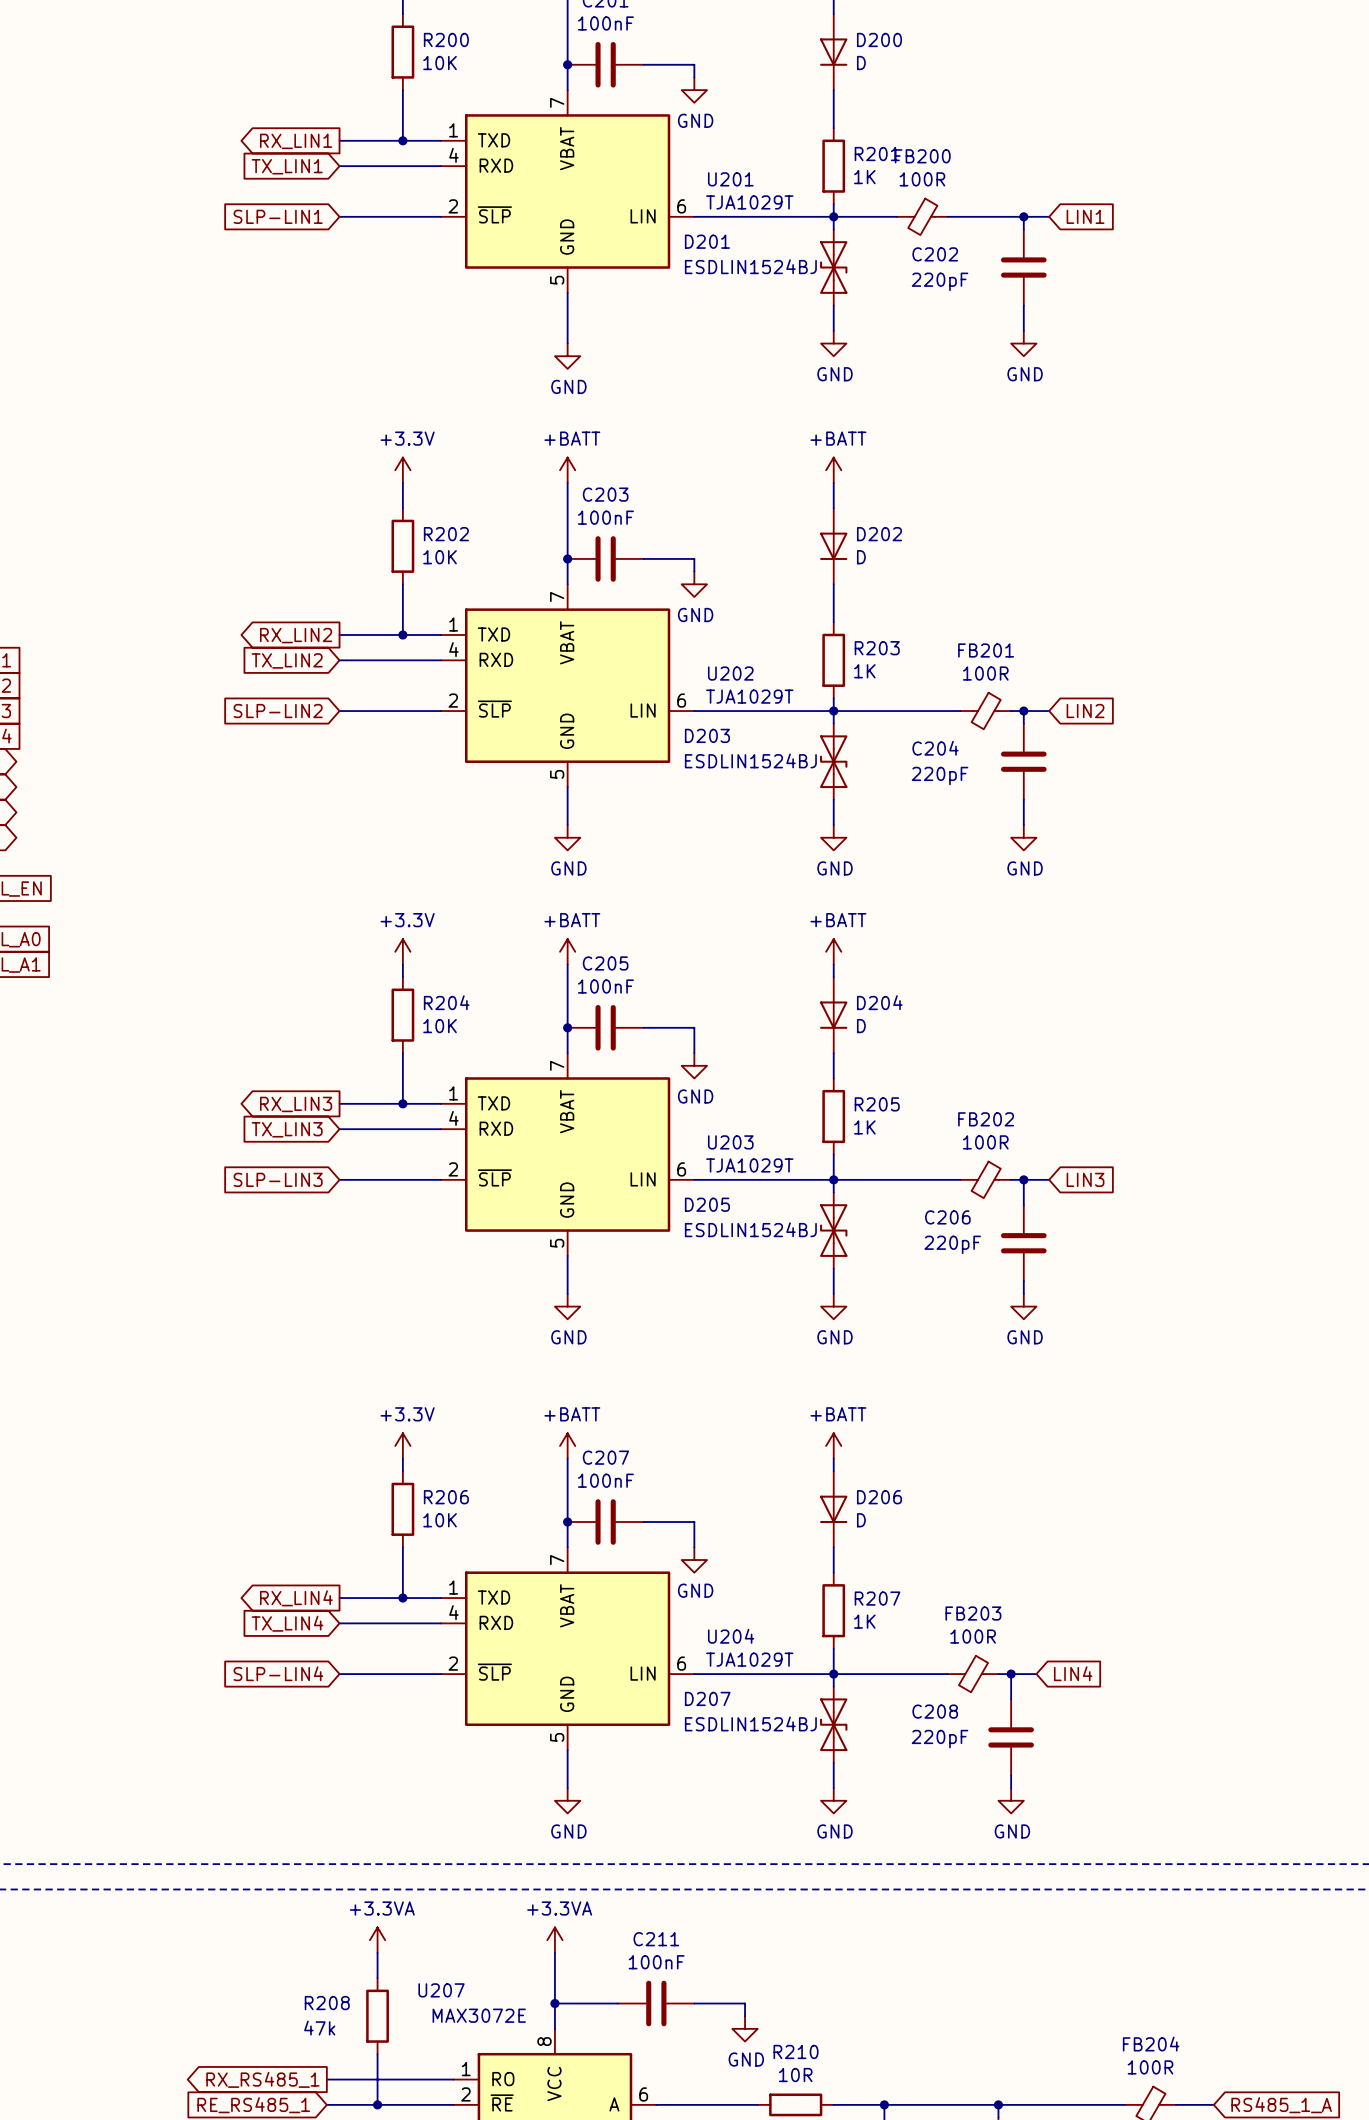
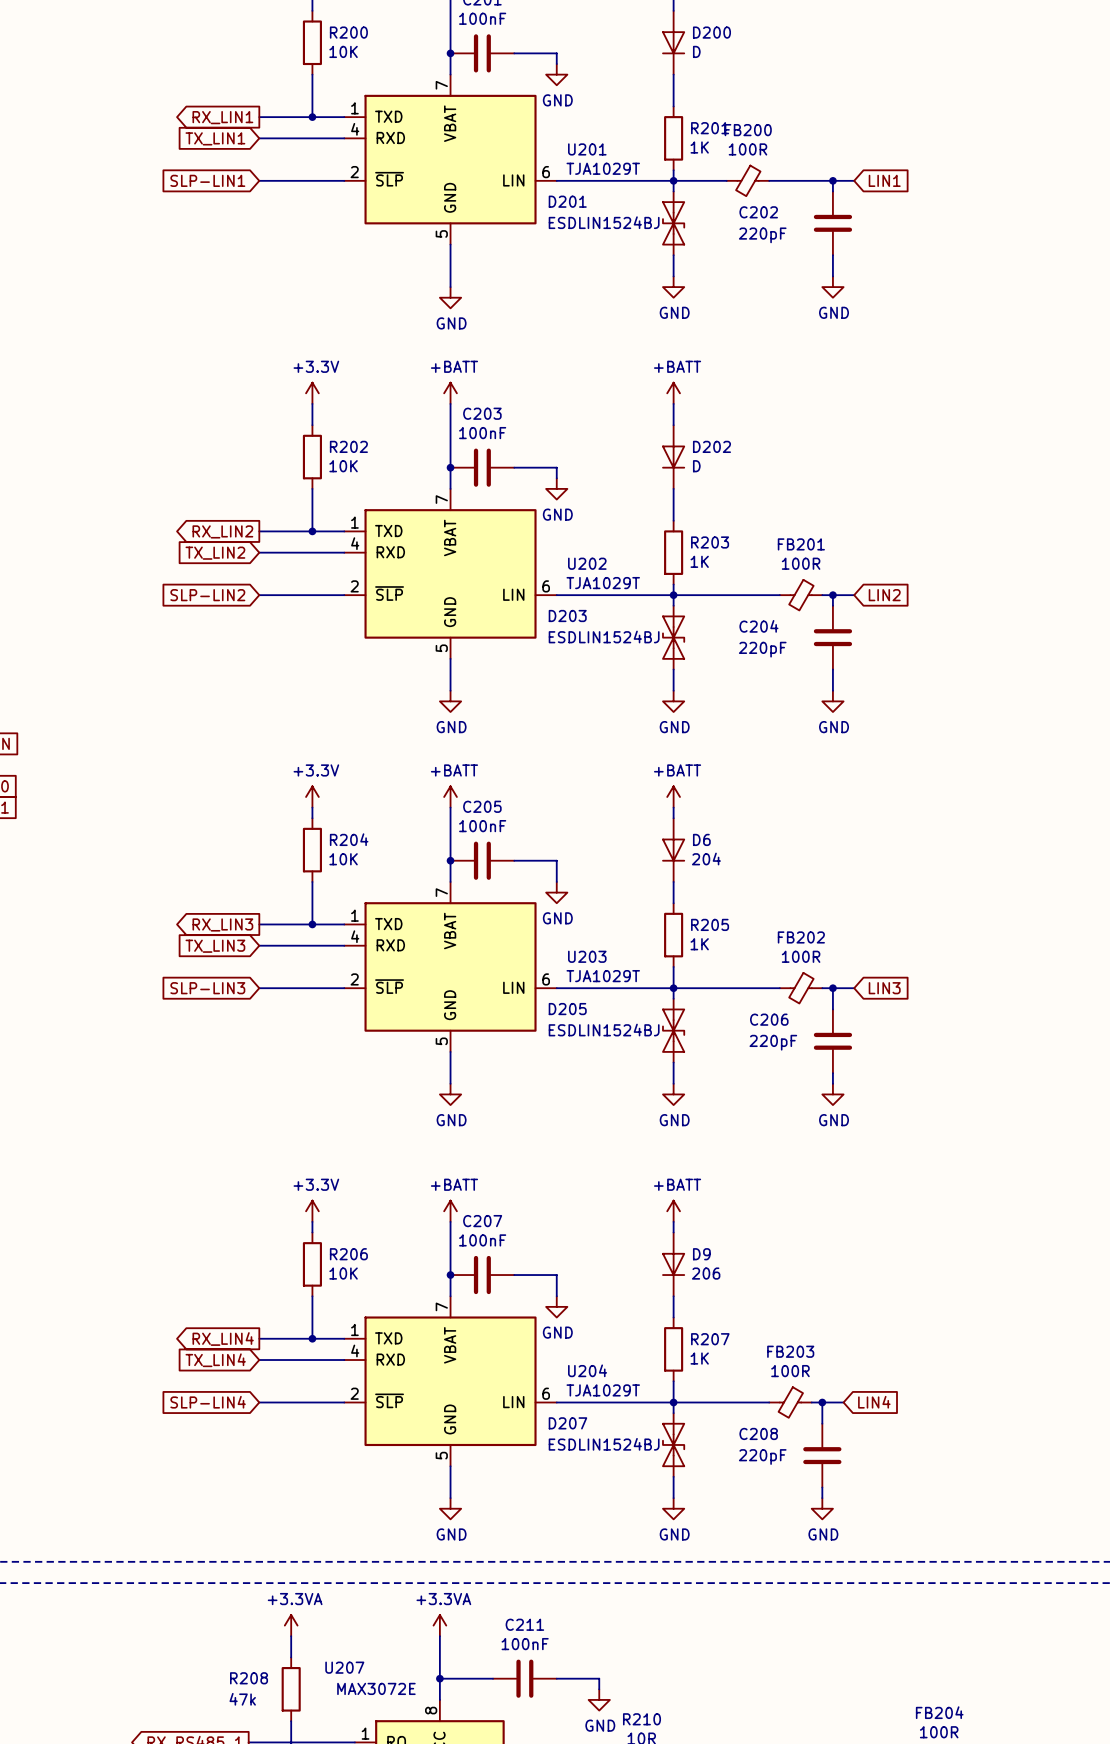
D204 name: D204 (879, 1002) -> D6 (701, 839)
D204 value: D (861, 1026) -> 204 (706, 859)
D206 name: D206 (879, 1497) -> D9 (701, 1254)
D206 value: D (861, 1520) -> 206 (706, 1273)

